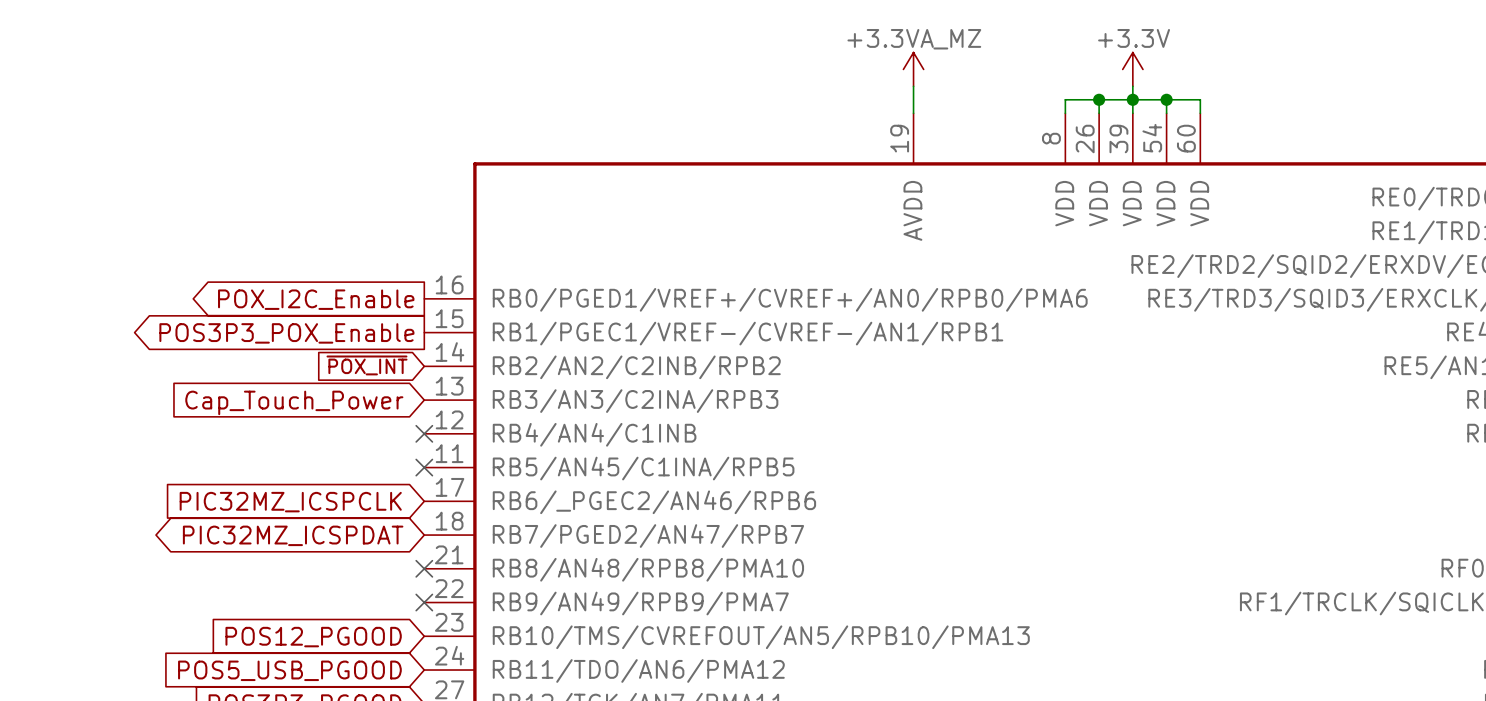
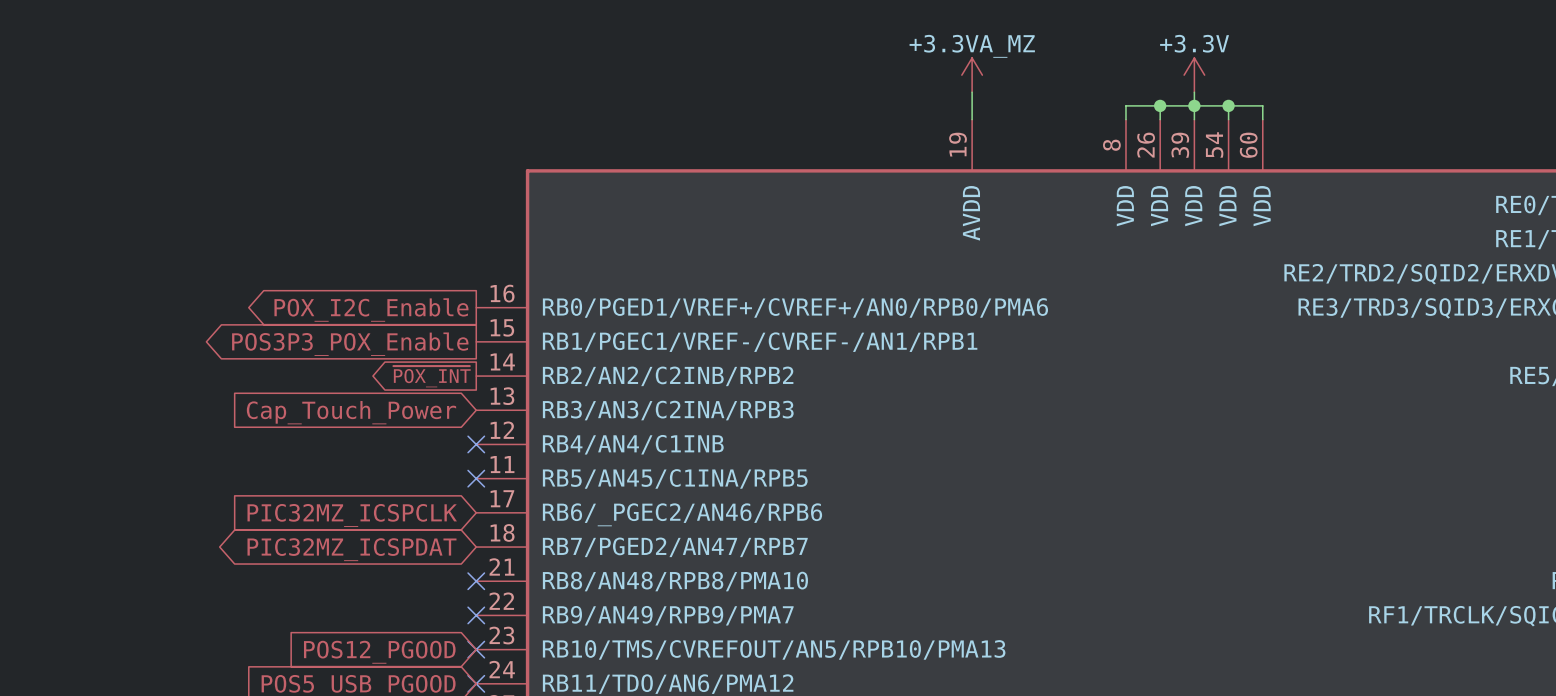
global label shape: input (367, 365) -> output (432, 376)
no-connect mark: none -> (476, 649)
no-connect mark: none -> (476, 683)

